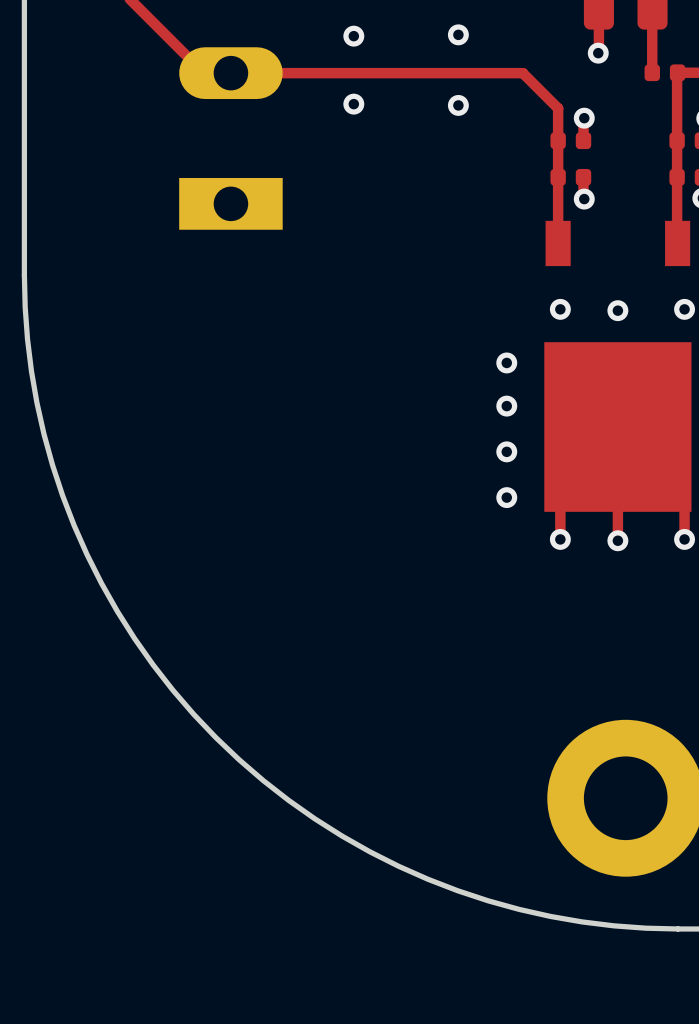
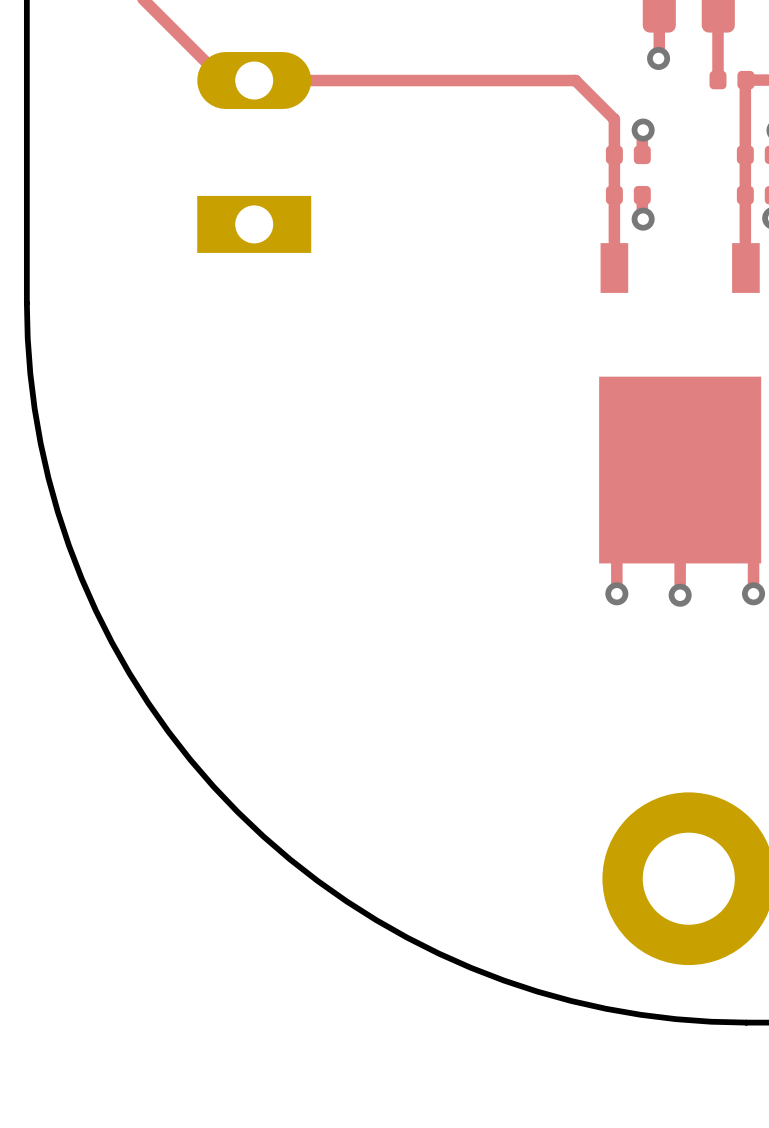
via: (458, 34) -> none
via: (353, 36) -> none
via: (353, 104) -> none
via: (458, 105) -> none
via: (560, 309) -> none
via: (684, 309) -> none
via: (617, 310) -> none
via: (506, 362) -> none
via: (506, 406) -> none
via: (506, 451) -> none
via: (506, 497) -> none

